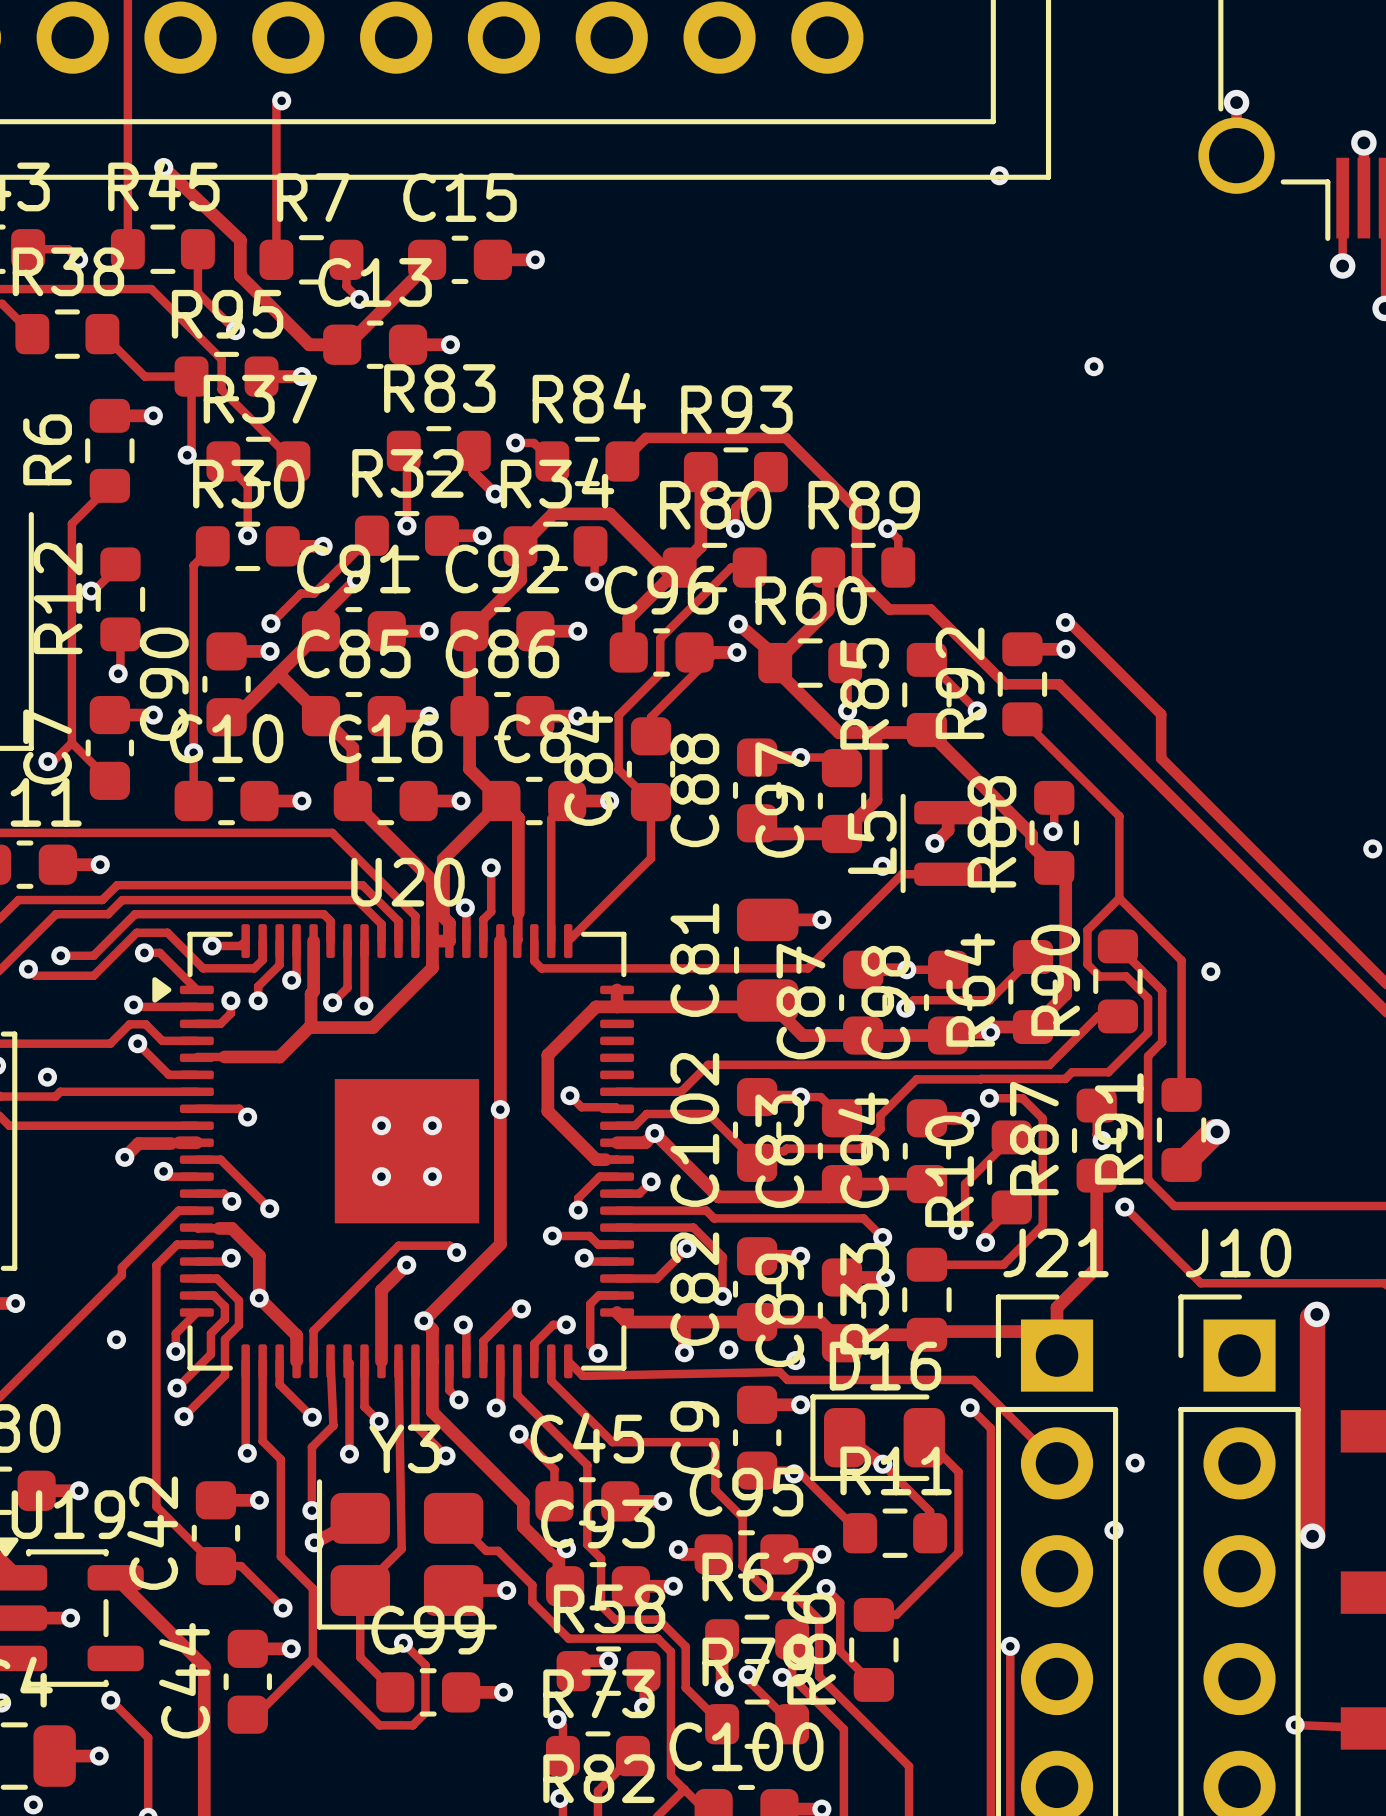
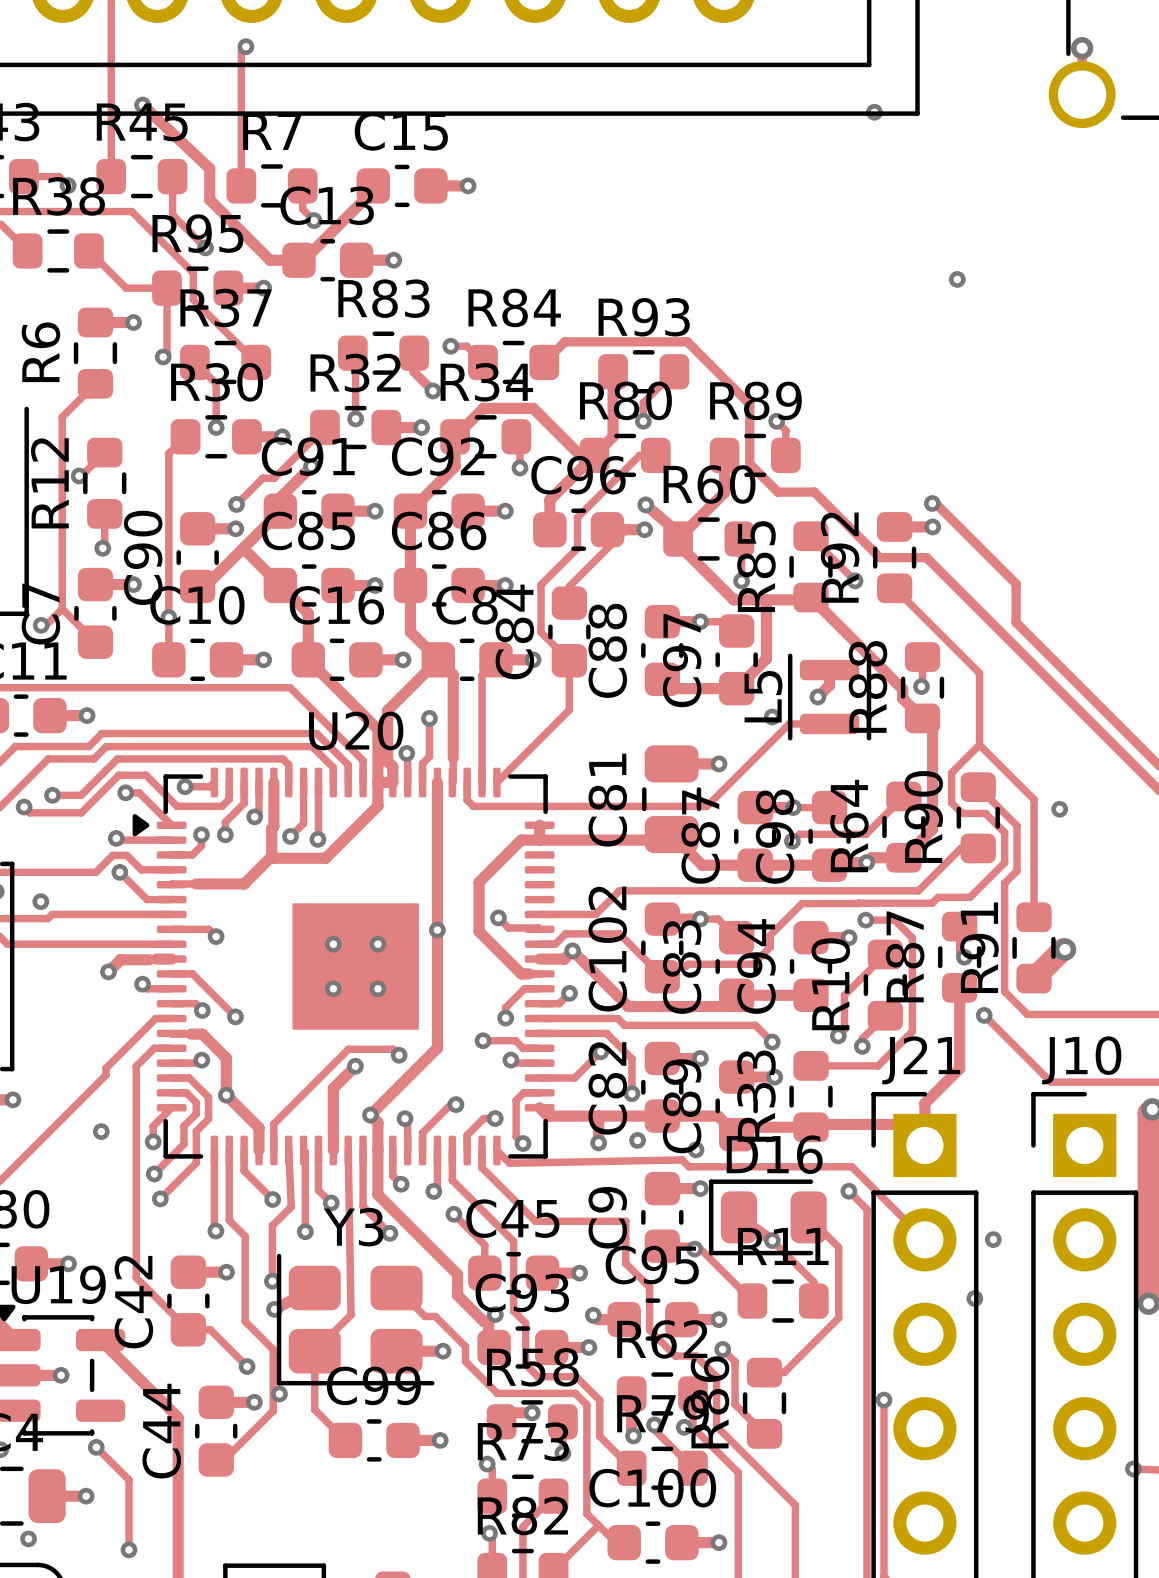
track: (403, 1643) (425, 1665) (425, 1712) (412, 1725) (379, 1725) (312, 1658) -> none
via position: (403, 1643) -> (279, 1393)

